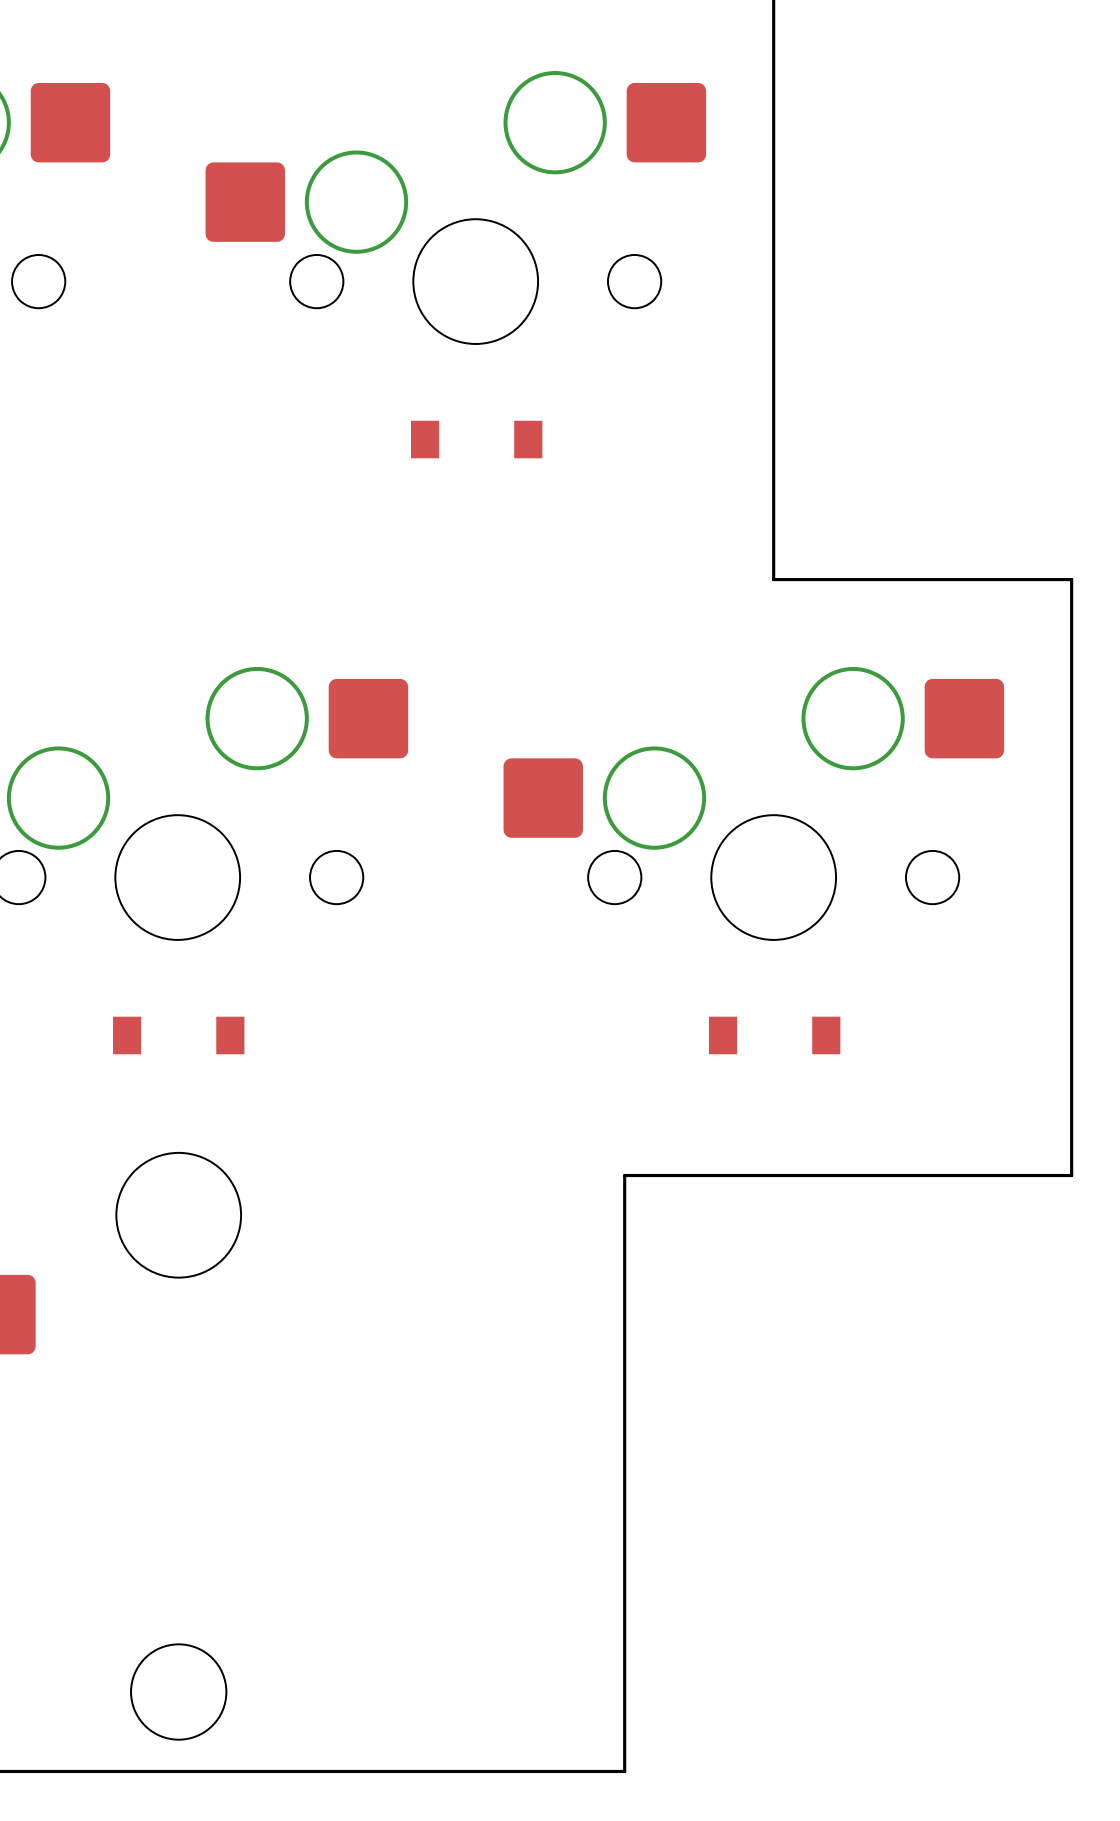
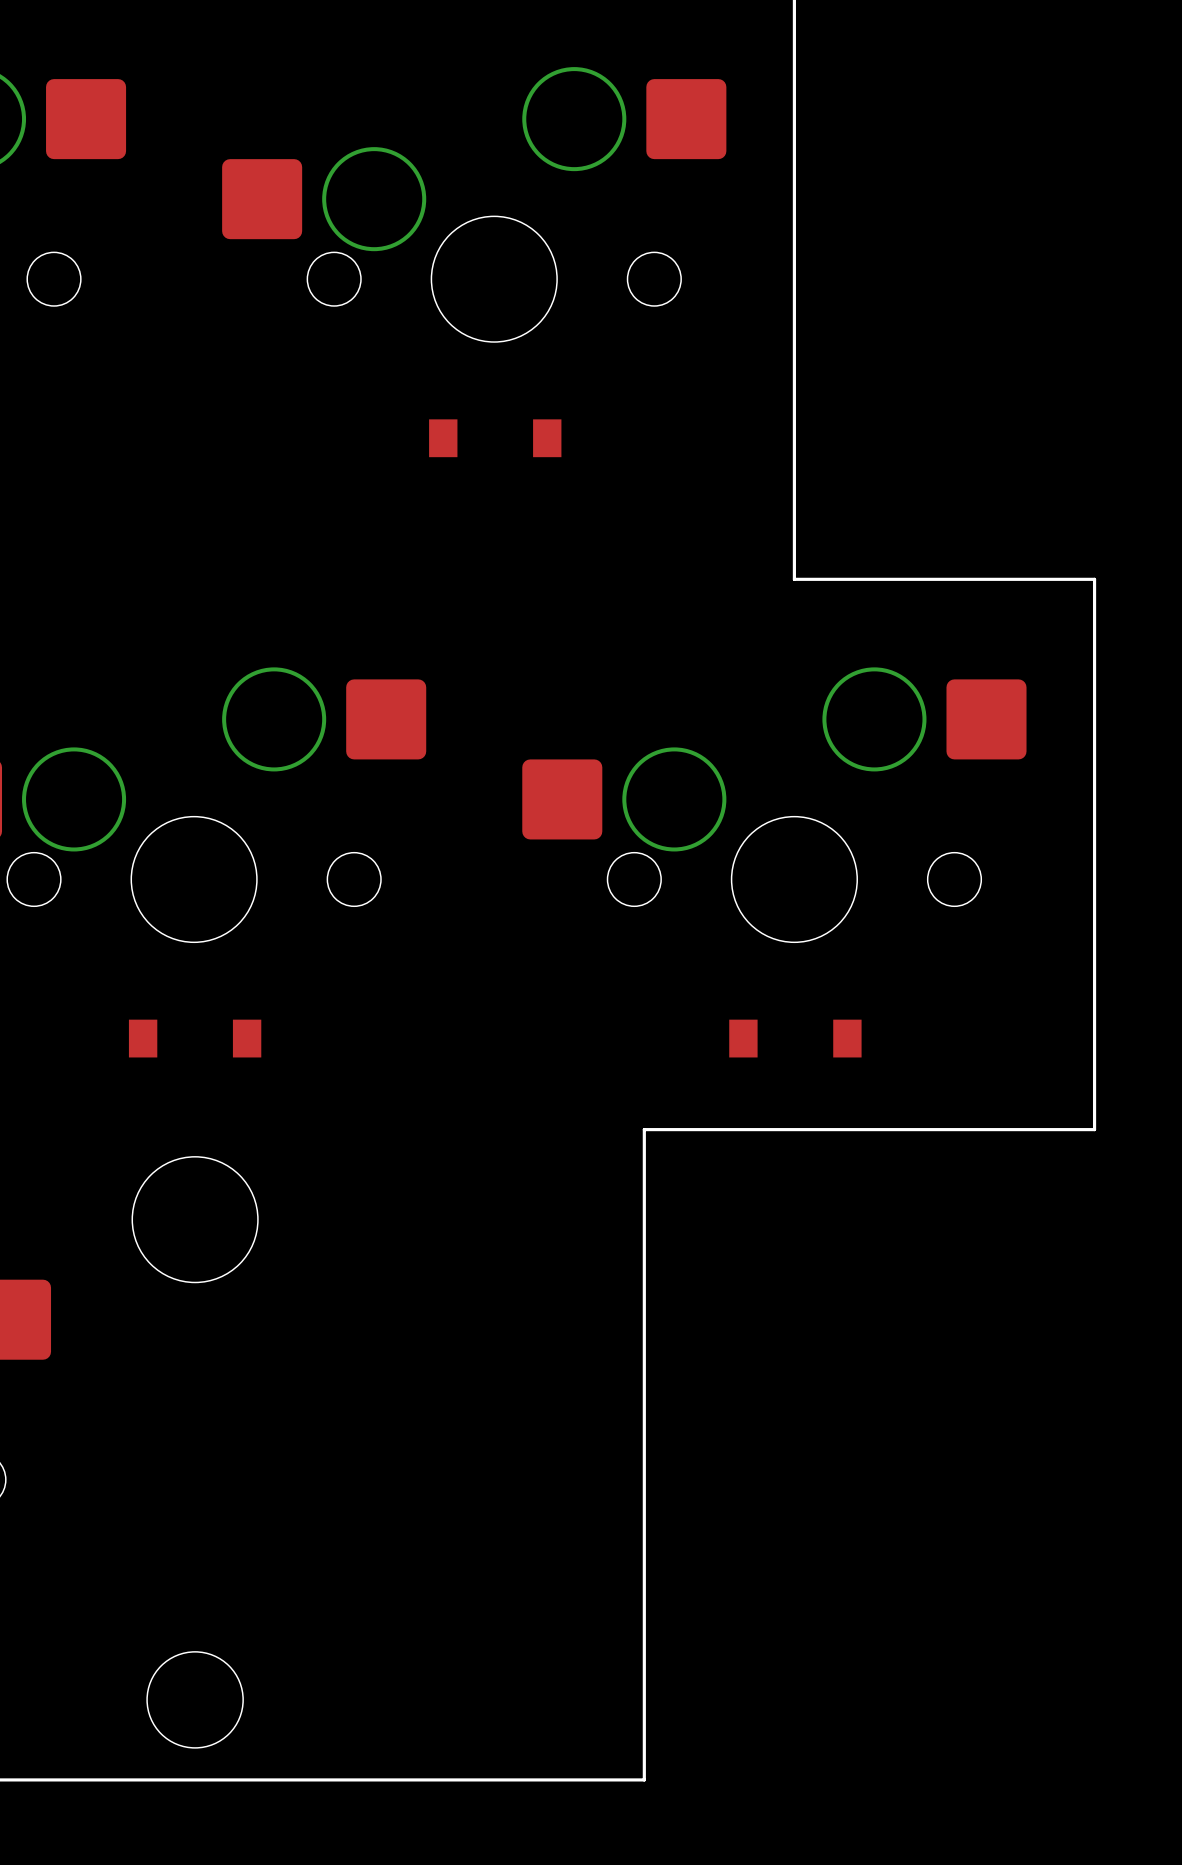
board edge: (1071, 1125) (1071, 1175) (624, 1175) -> (1094, 1129) (644, 1129) (644, 1179)

